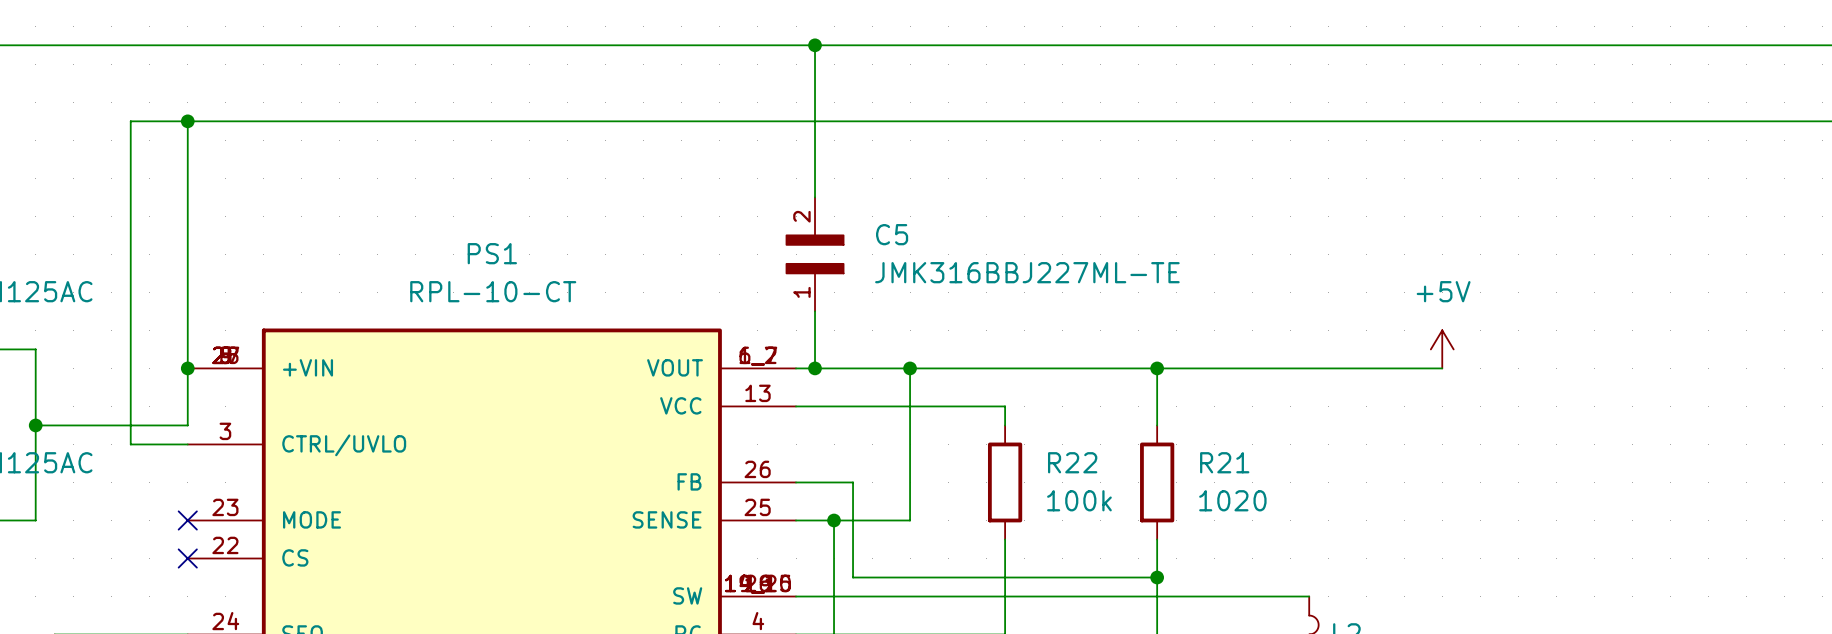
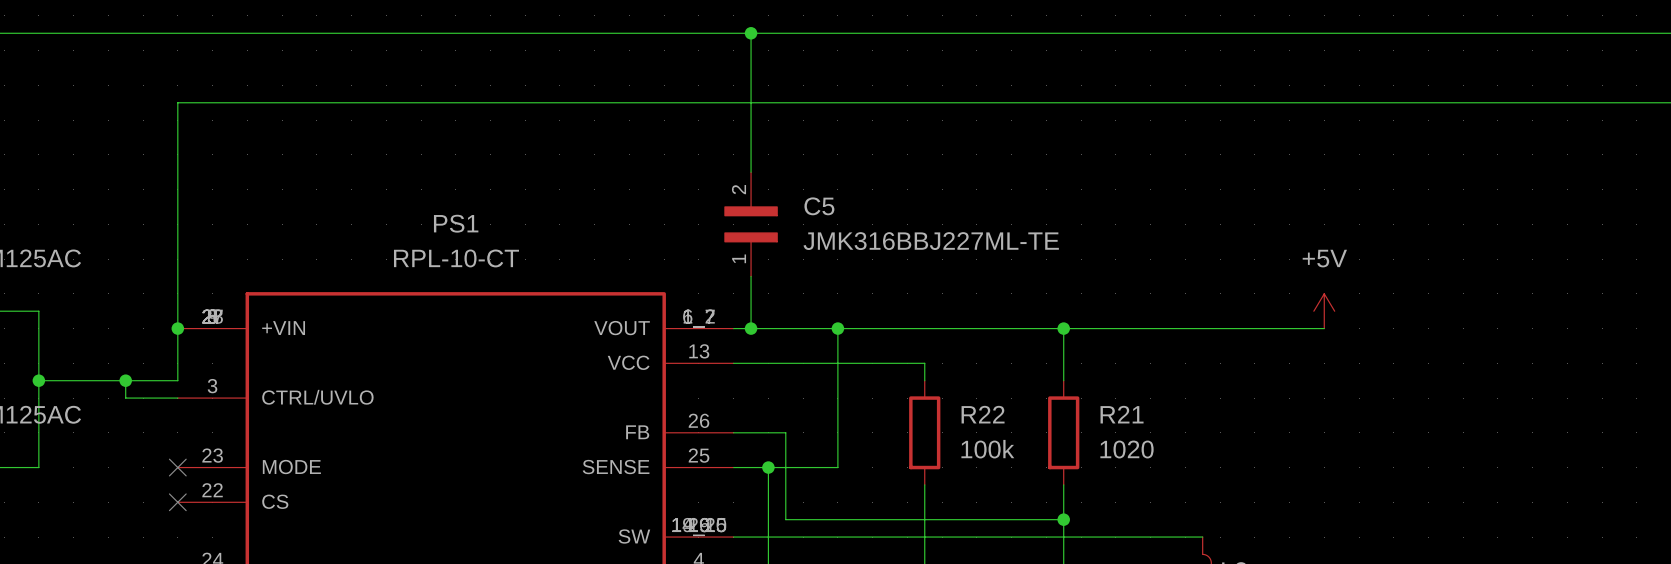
wire: (187, 121) (130, 121) (130, 425) -> none
junction: (187, 121) -> none
junction: none -> (125, 380)

